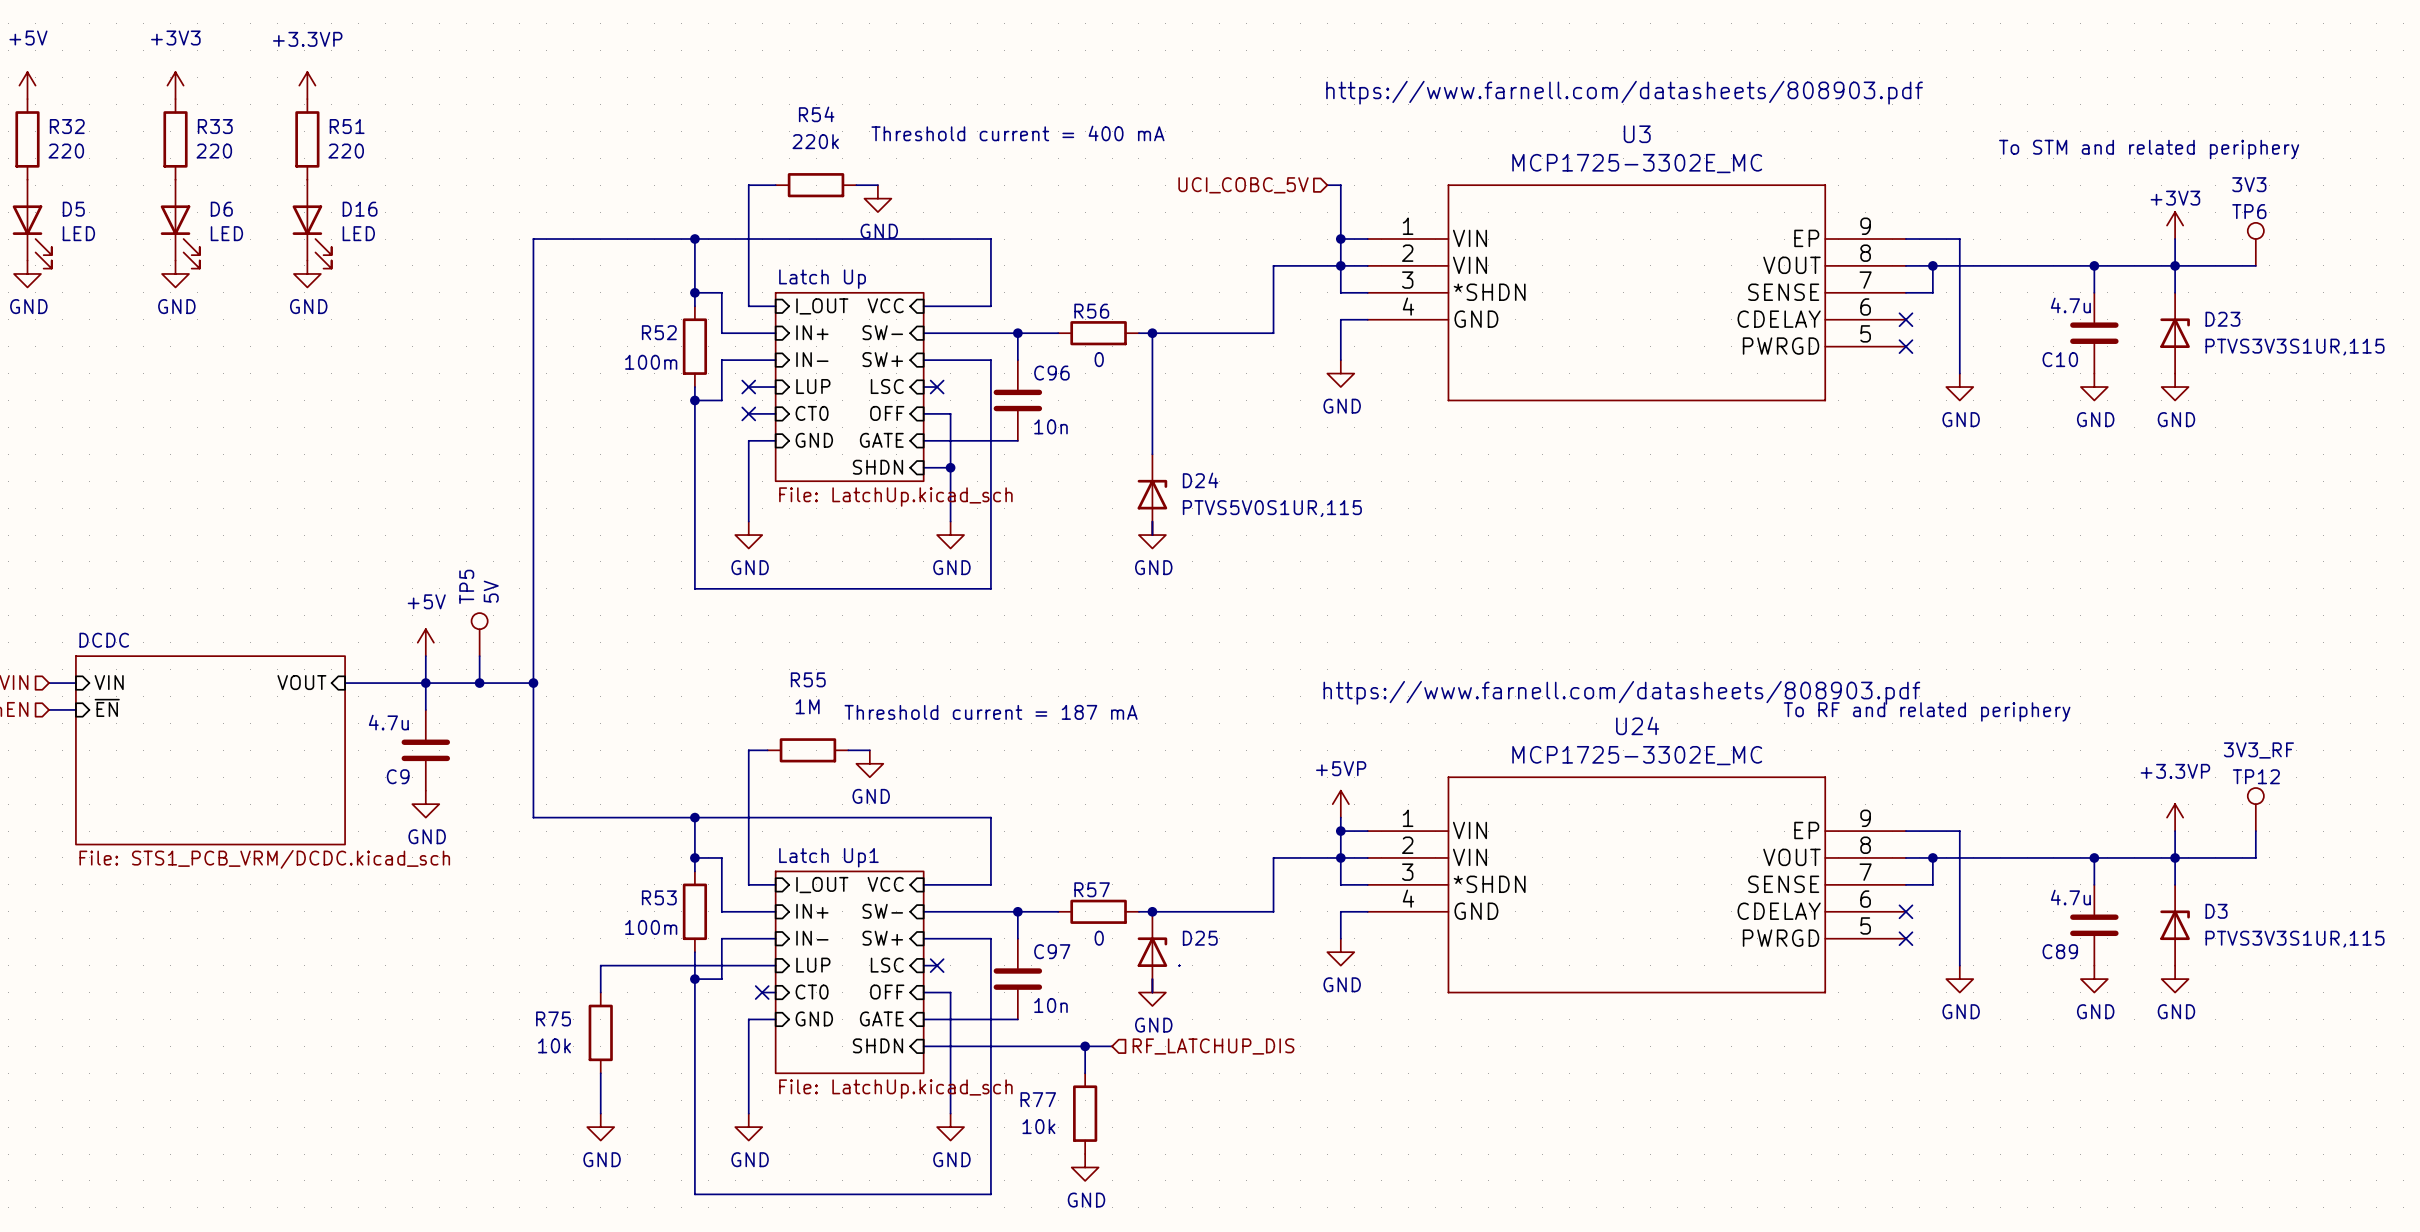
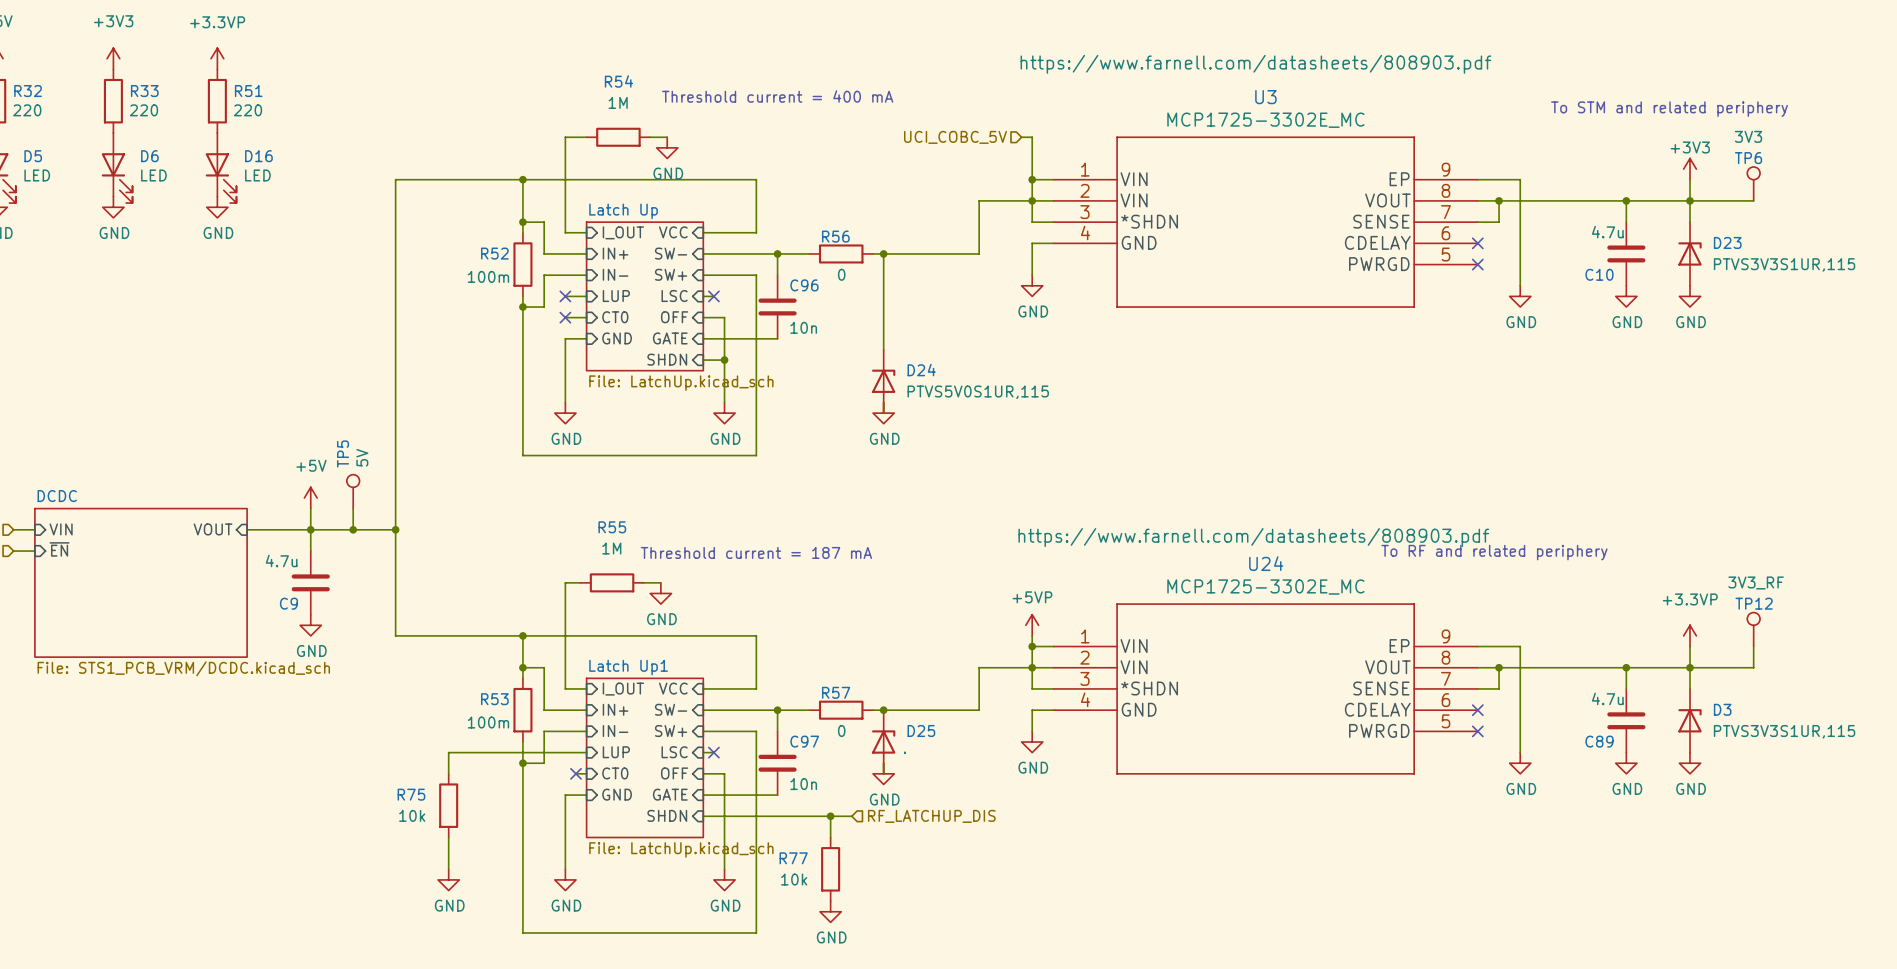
R54 value: 220k (815, 141) -> 1M (618, 102)

